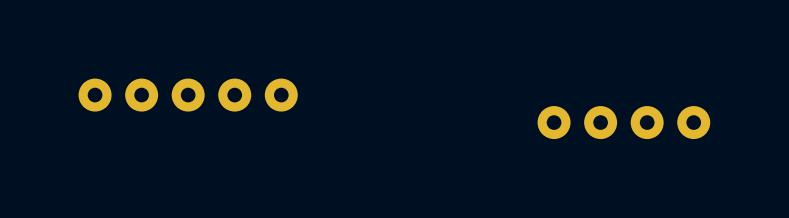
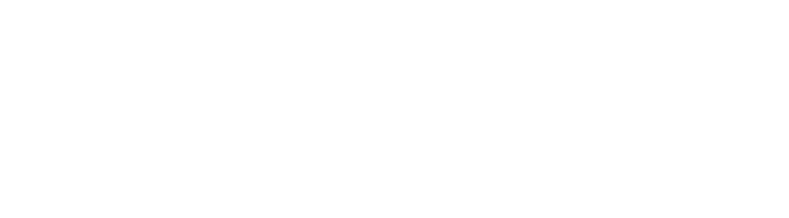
part: (188, 95) -> none
part: (623, 122) -> none

